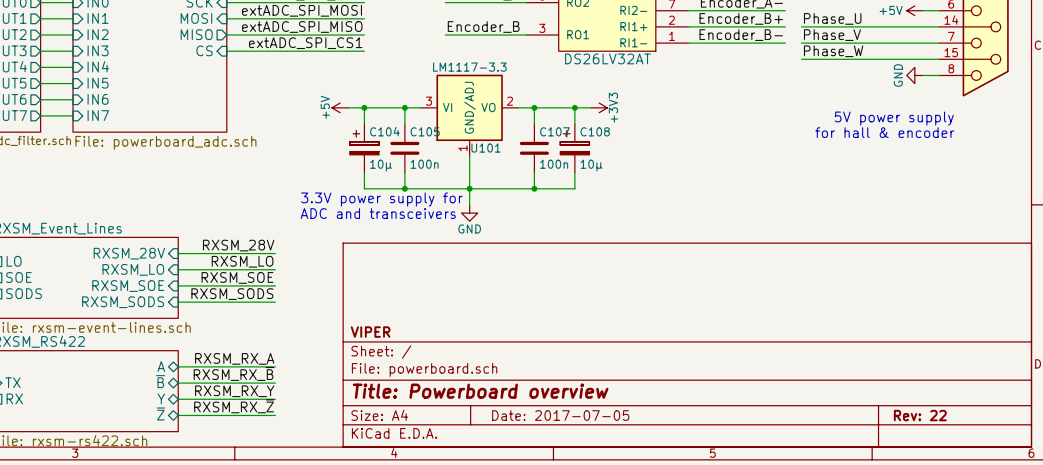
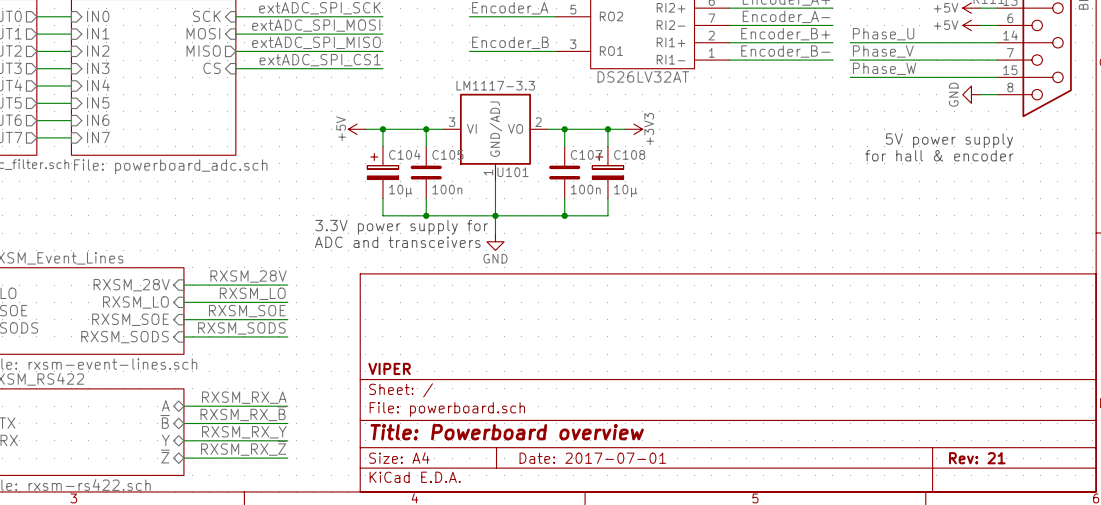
title block: Date: 2017-07-05 (560, 415) -> Date: 2017-07-01 (592, 458)
title block: Rev: 22 (920, 415) -> Rev: 21 (977, 458)

